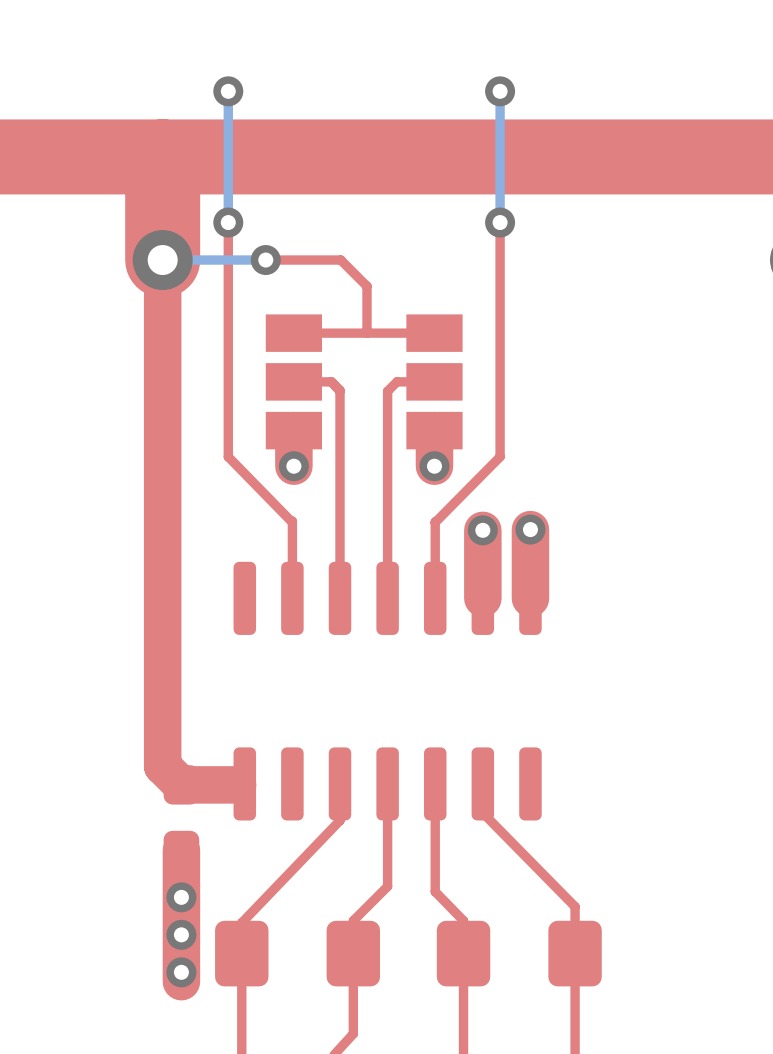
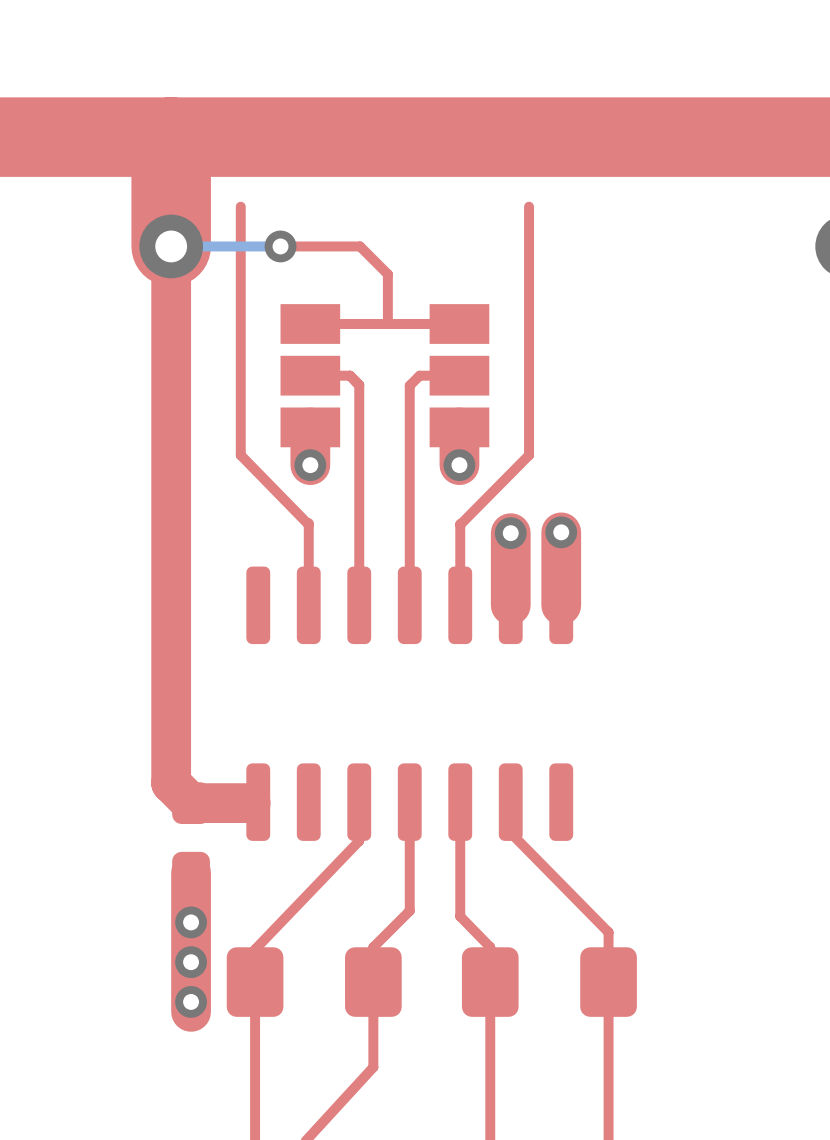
bottom track: (228, 91) (228, 222) -> none
via: (228, 91) -> none
bottom track: (500, 91) (500, 222) -> none
via: (500, 91) -> none
via: (228, 222) -> none
via: (500, 222) -> none

